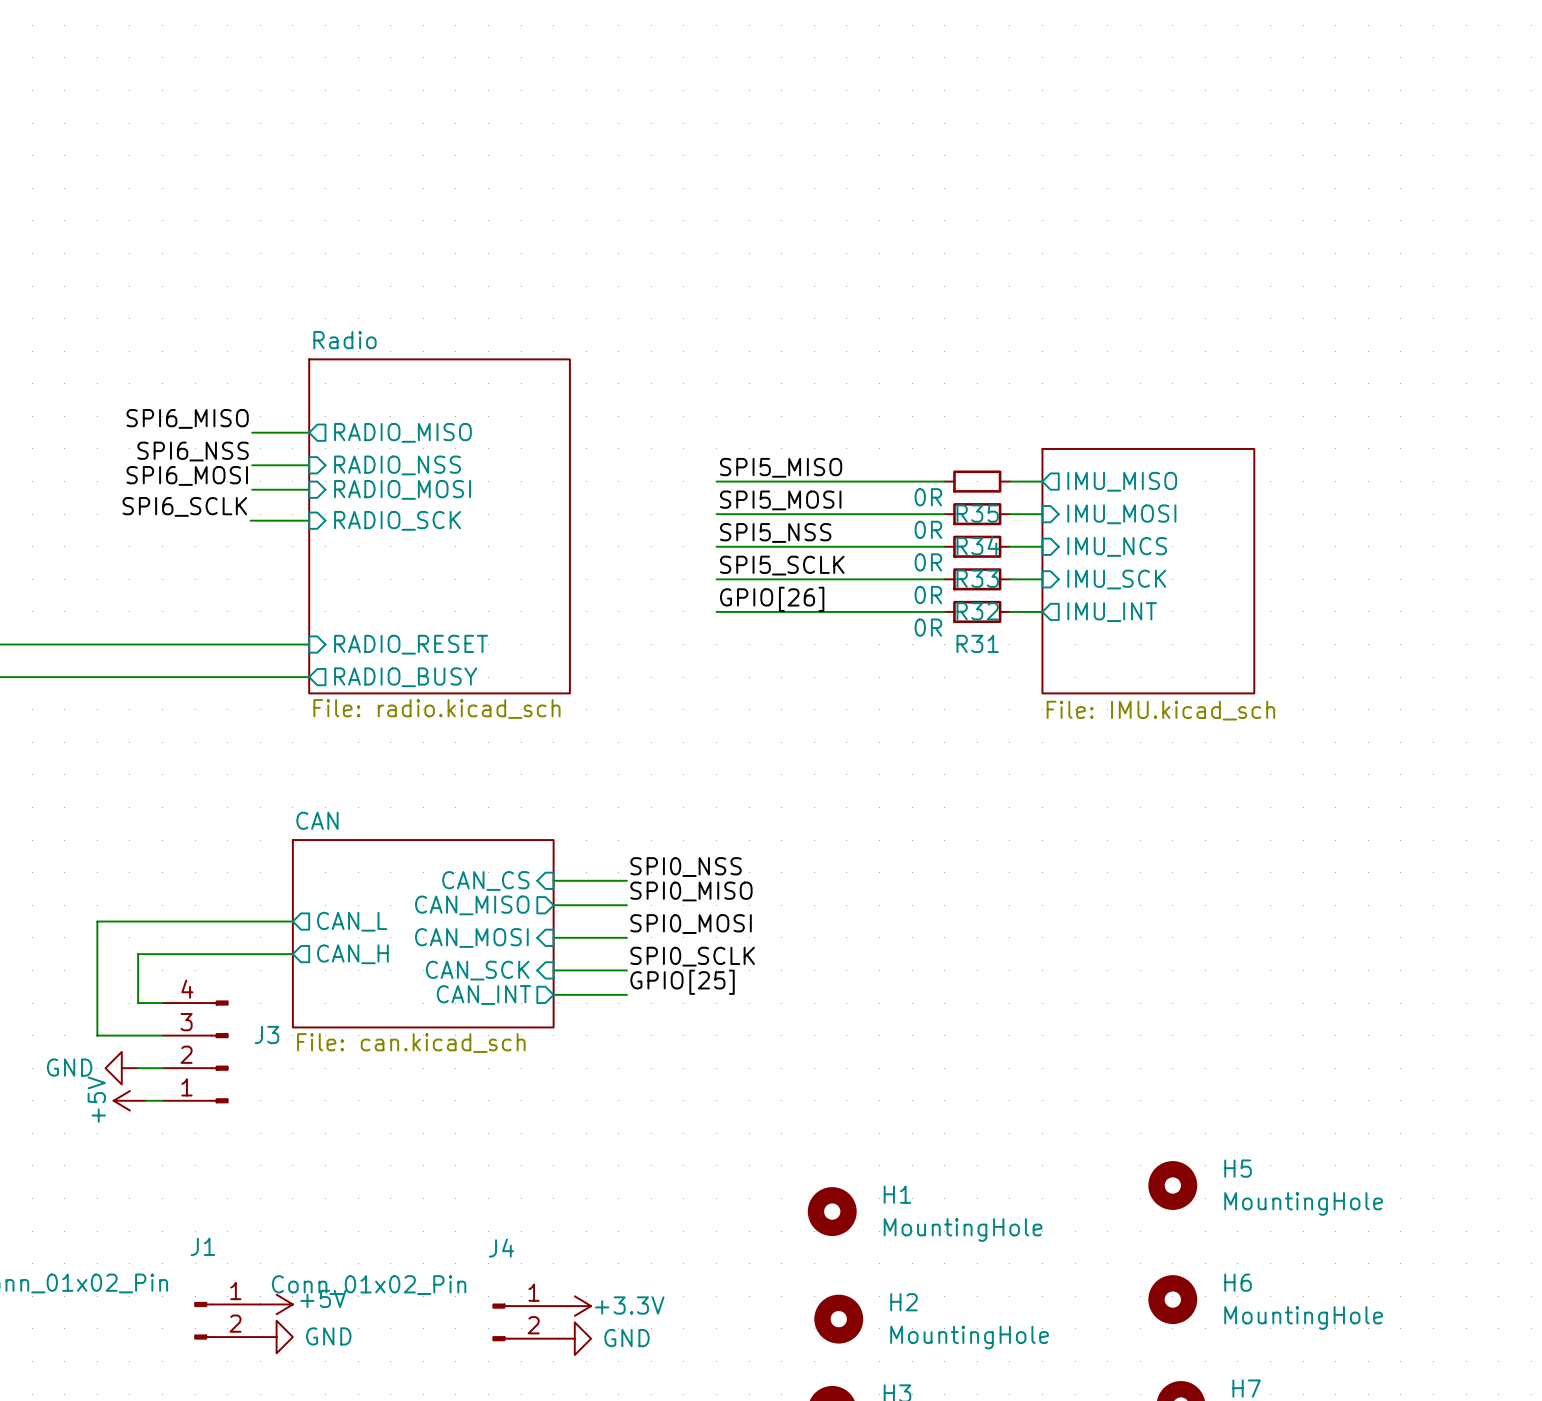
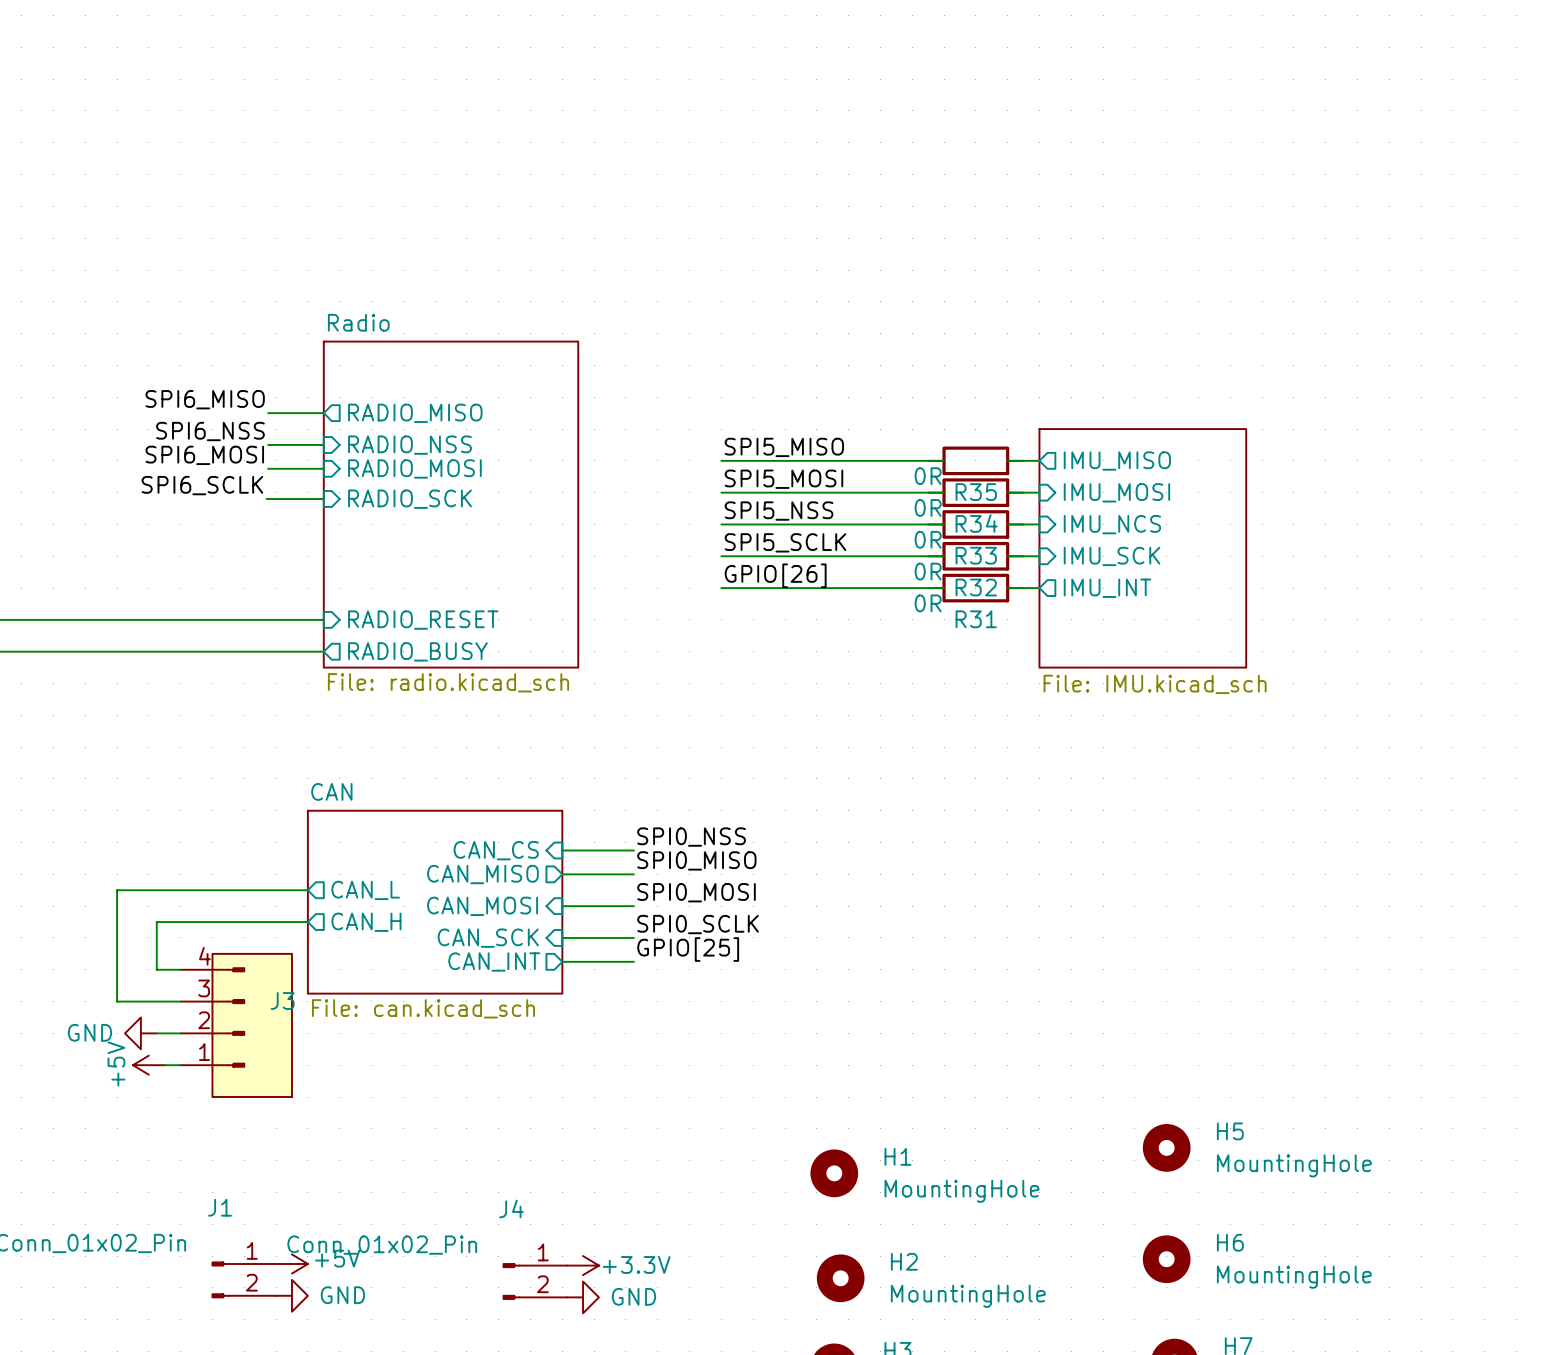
R35 symbol: [944, 470, 1010, 493] -> [928, 446, 1024, 476]
R34 symbol: [944, 503, 1010, 526] -> [928, 478, 1024, 507]
R33 symbol: [944, 535, 1010, 558] -> [928, 510, 1024, 539]
R32 symbol: [944, 568, 1010, 591] -> [928, 541, 1024, 571]
R31 symbol: [944, 600, 1010, 624] -> [928, 573, 1024, 603]
J3 symbol: [162, 1000, 229, 1104] -> [180, 953, 292, 1098]

